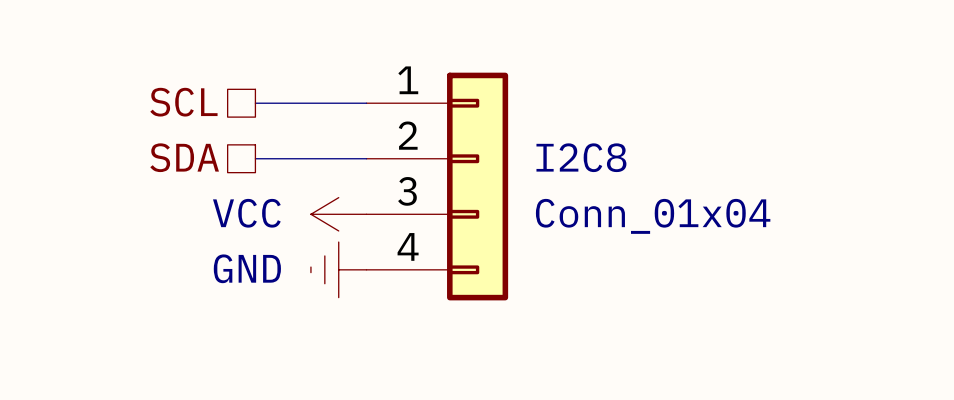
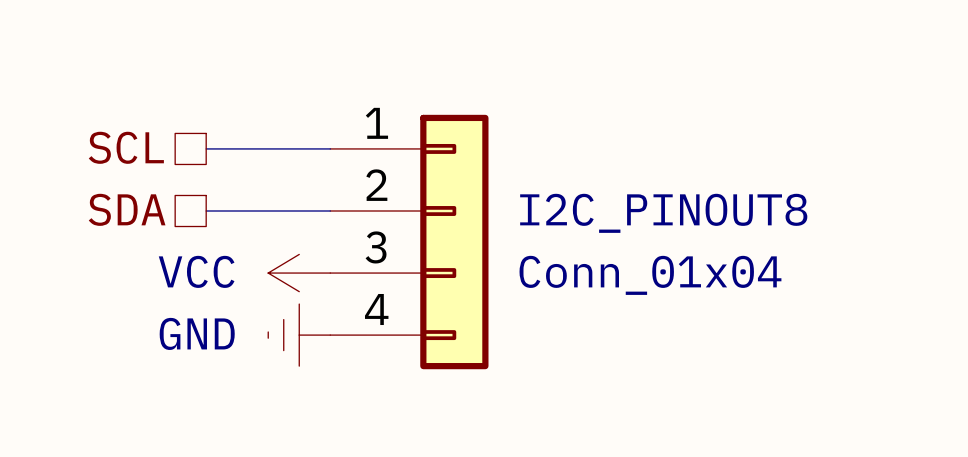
I2C8 name: I2C8 (581, 157) -> I2C_PINOUT8 (663, 213)

